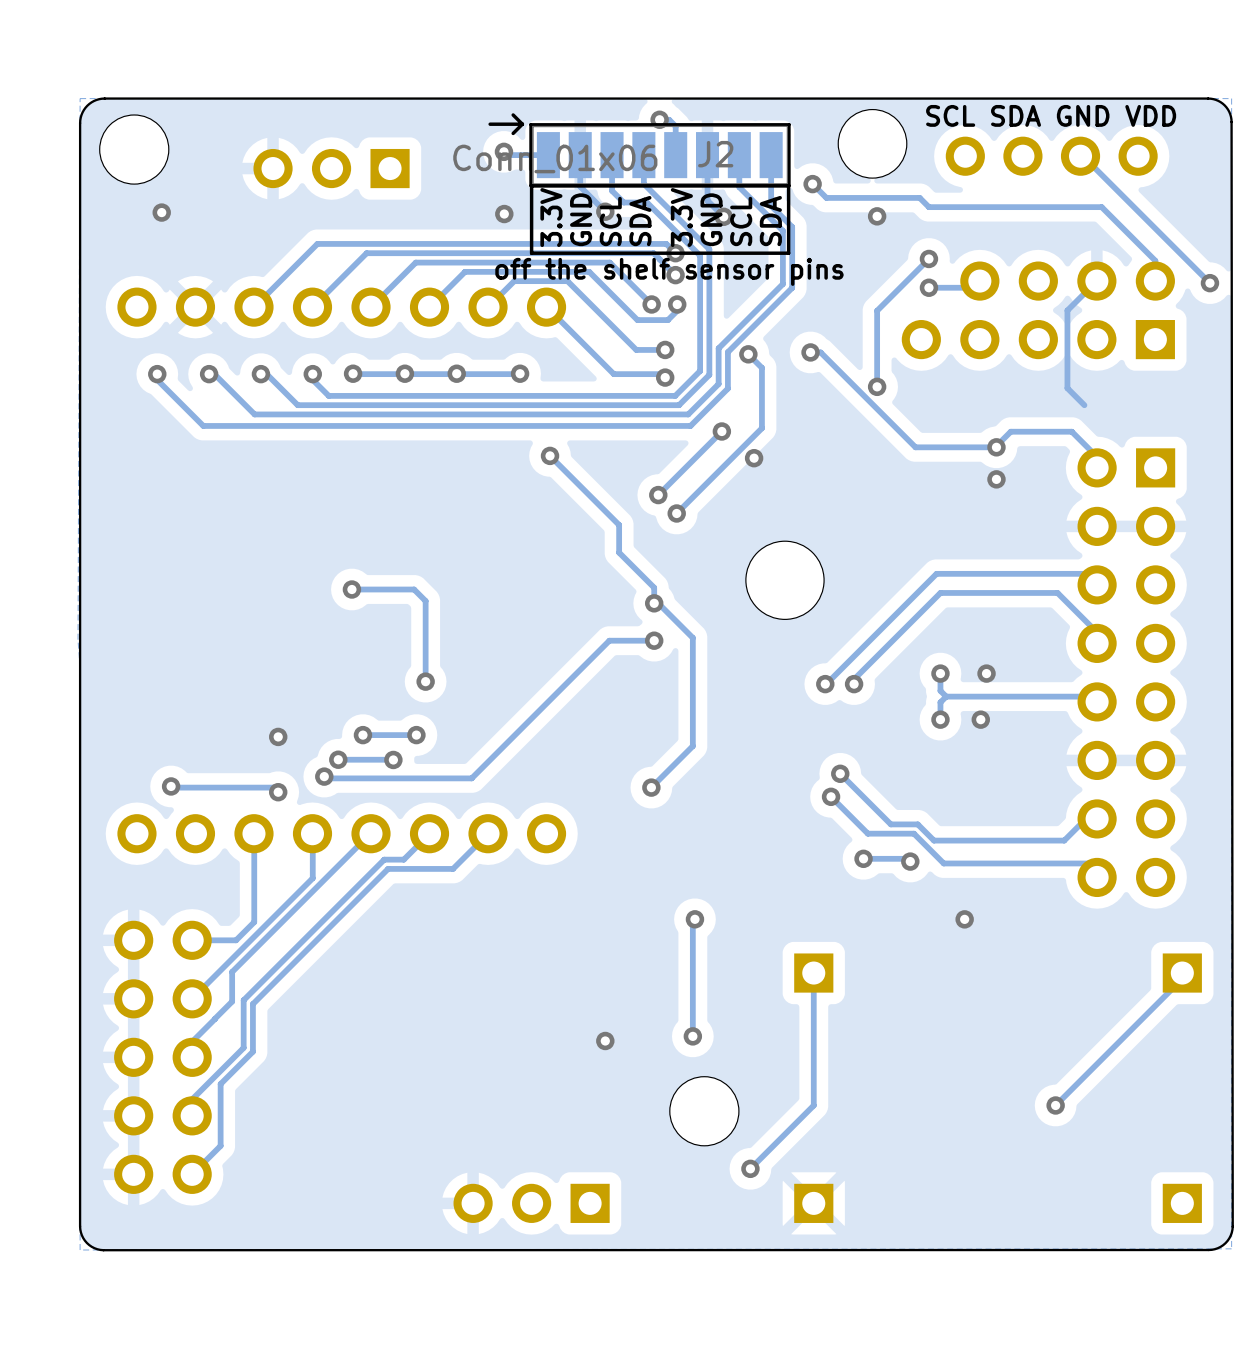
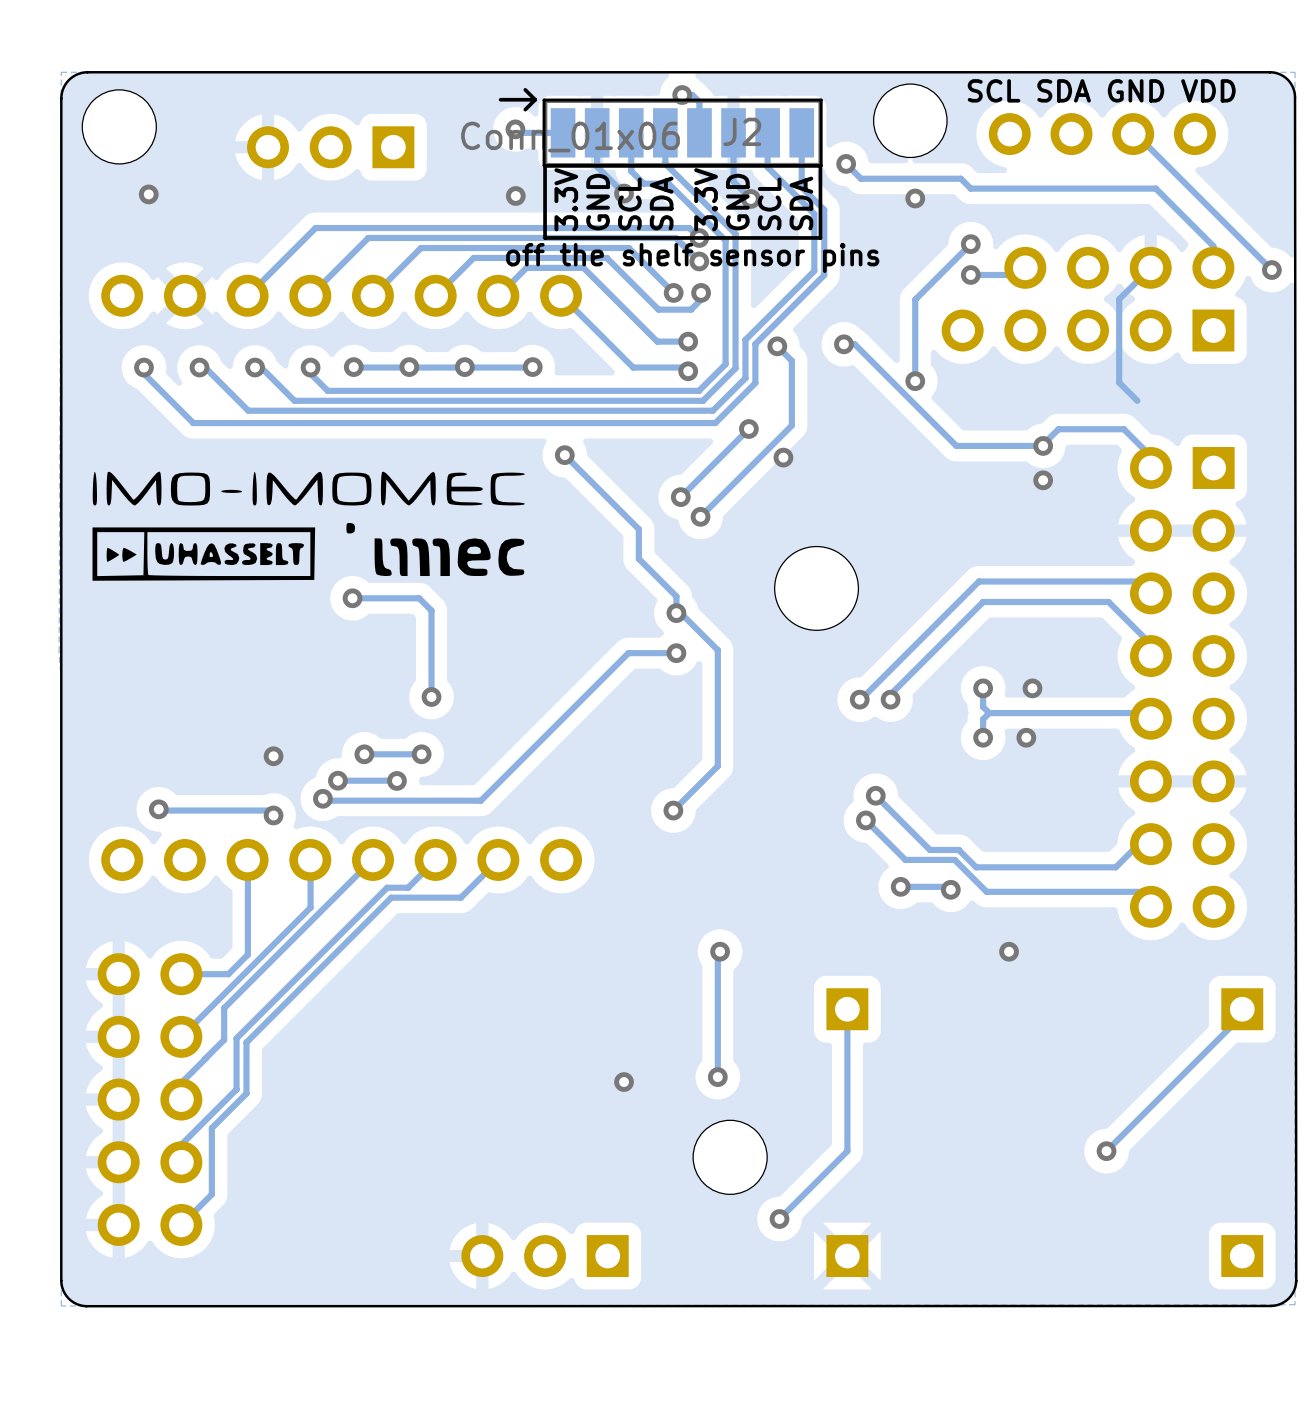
drawing: none -> [92, 471, 526, 581]

